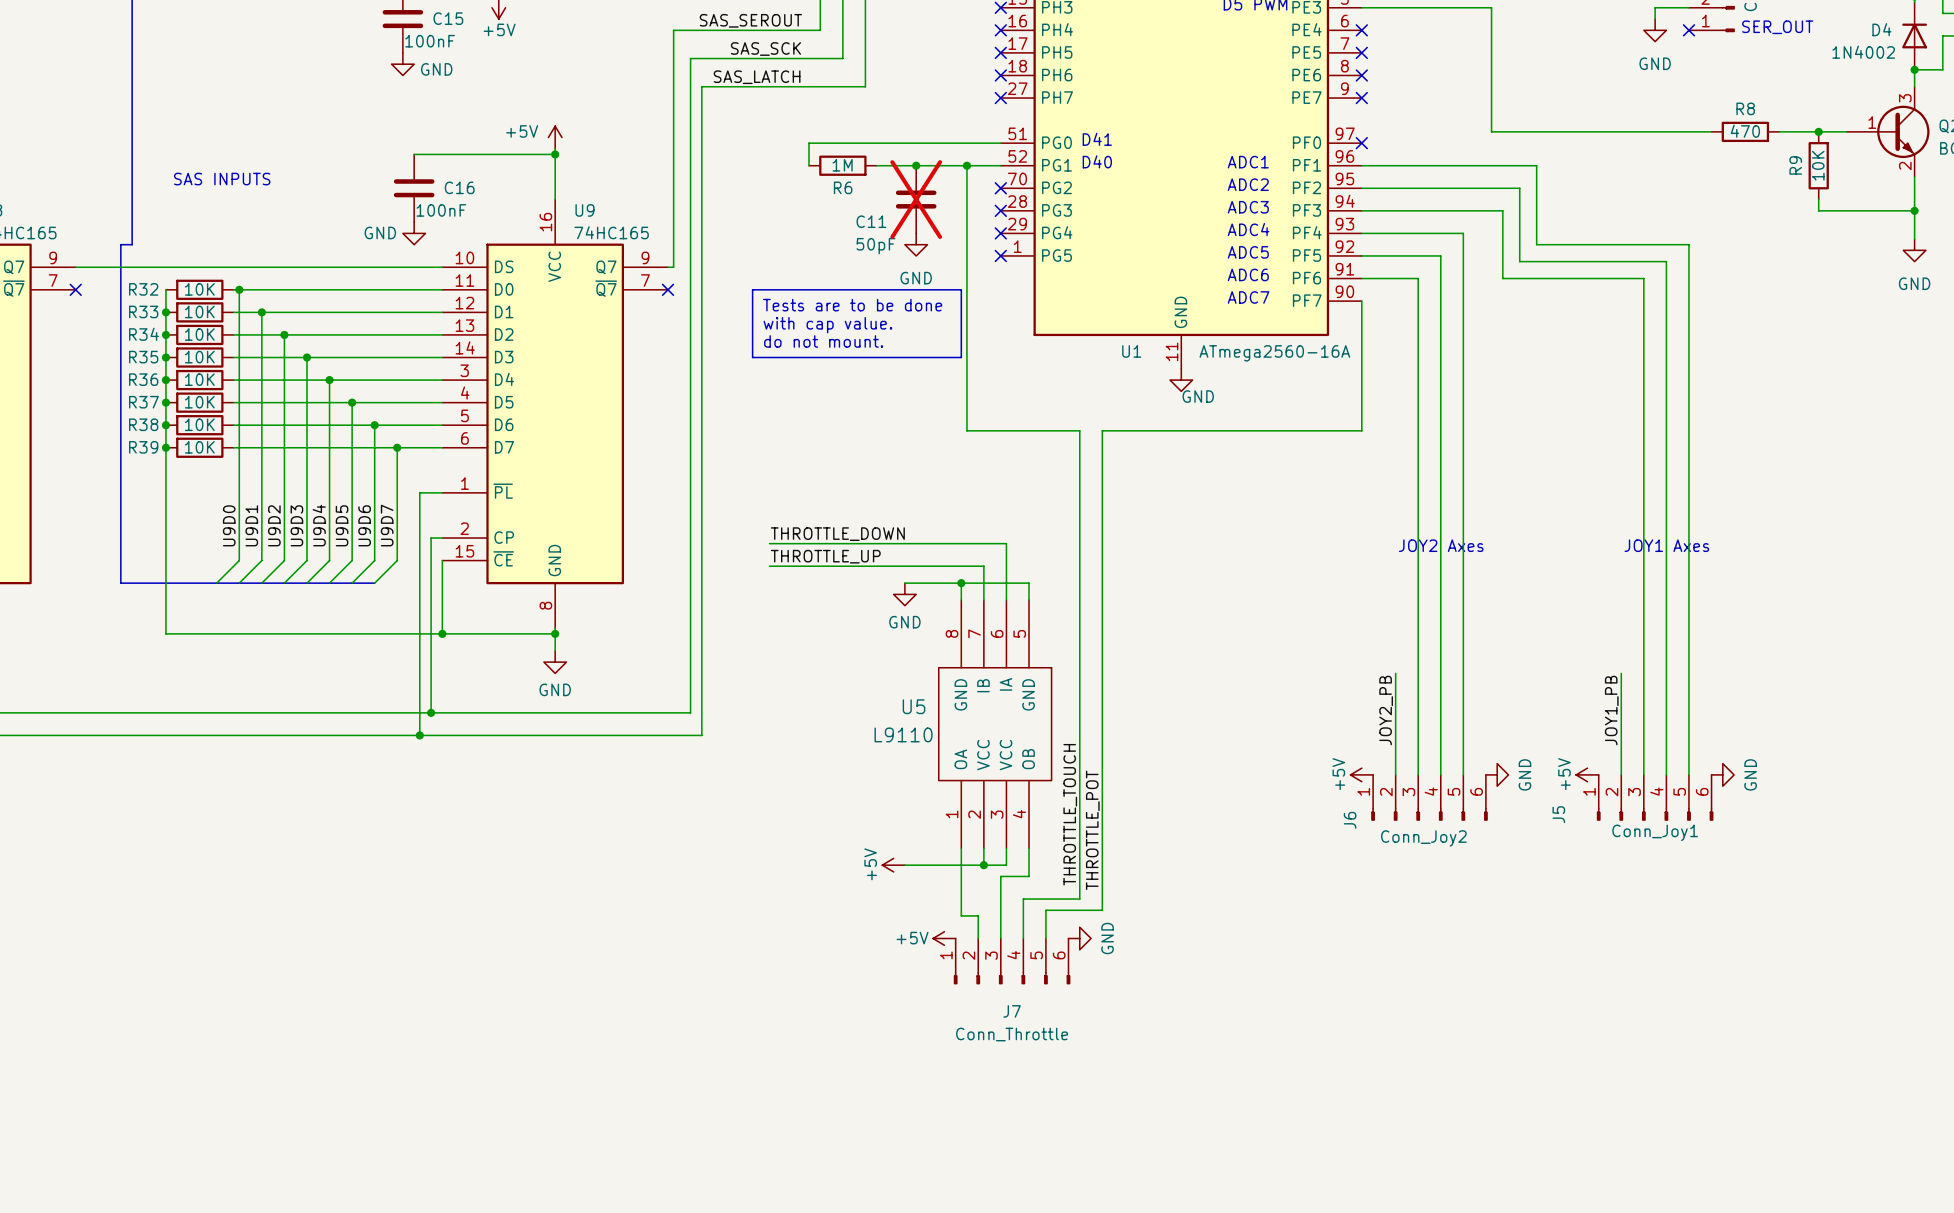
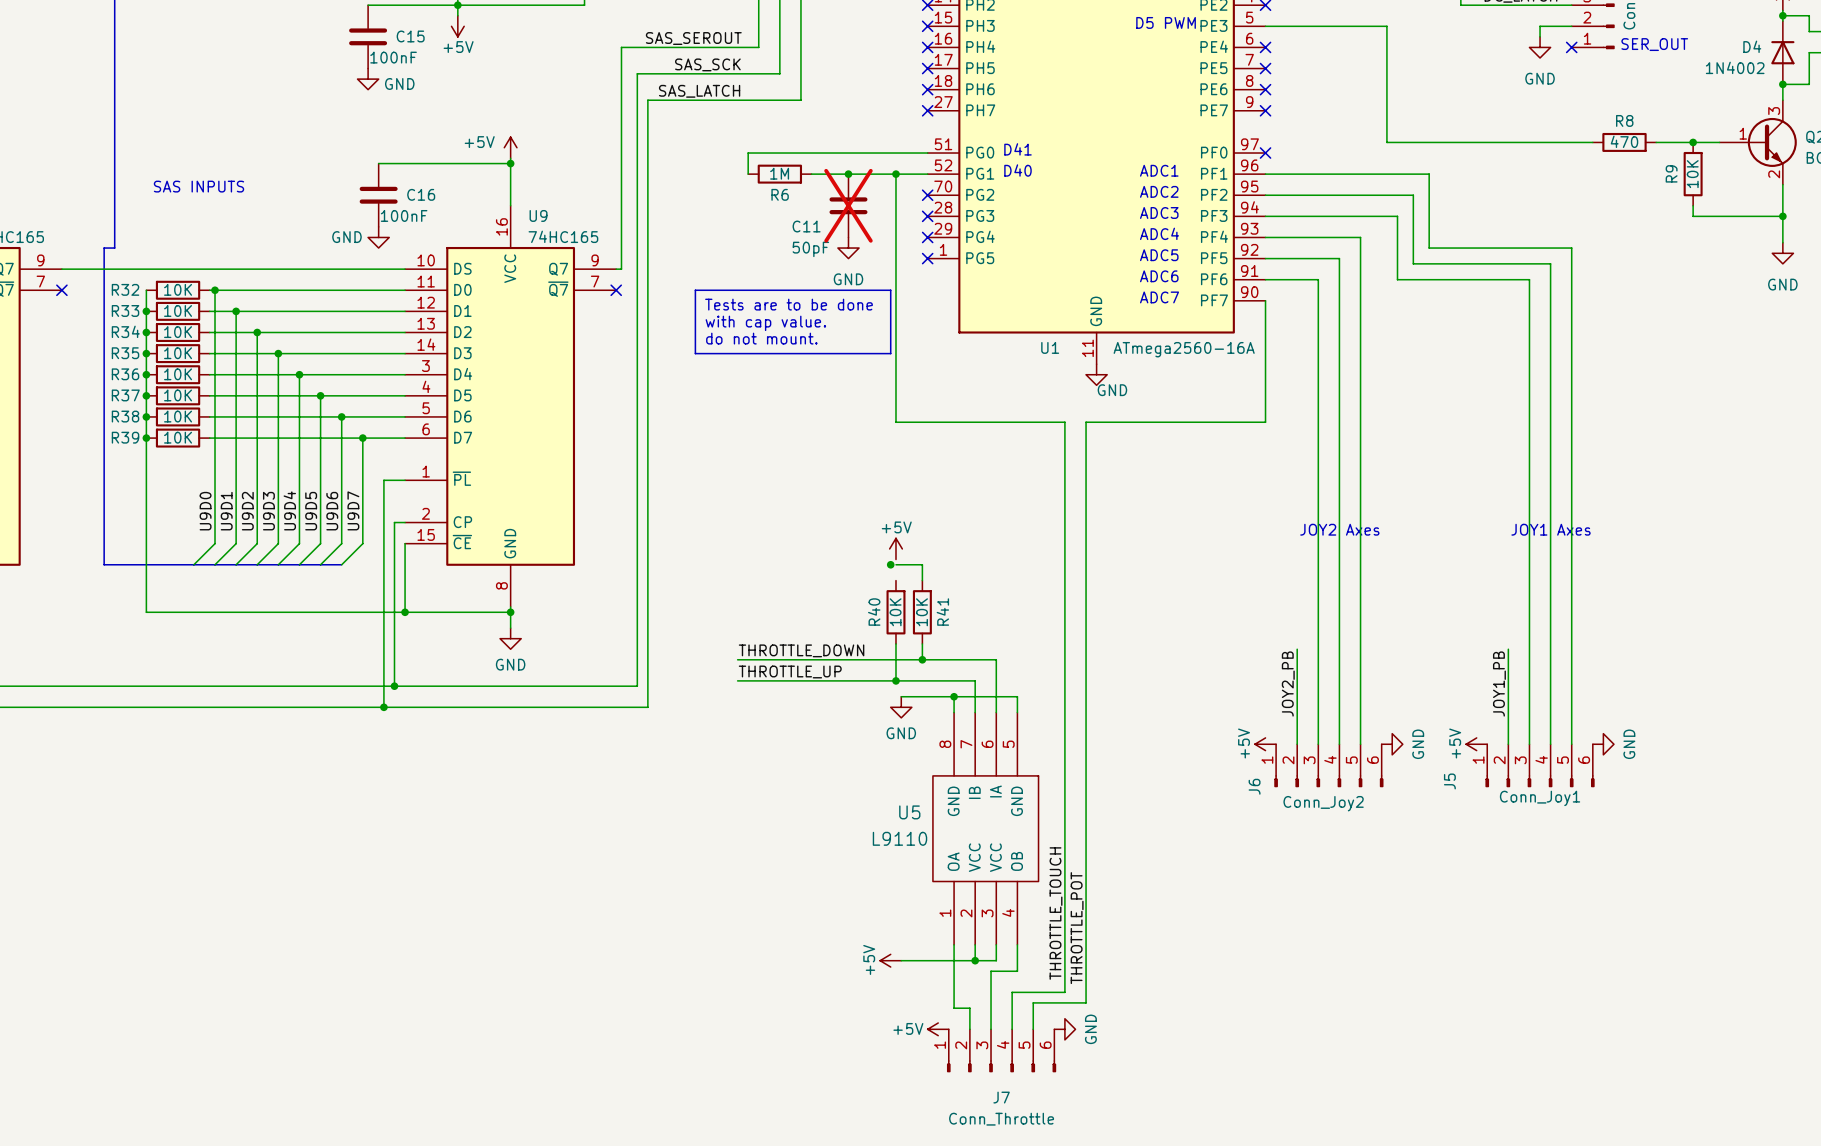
wire: (1079, 430) (1079, 899) (1023, 899) (1023, 938) -> none
wire: (1102, 430) (1102, 910) (1045, 910) (1045, 938) -> (1022, 422) (1001, 422)
wire: (1147, 430) (1170, 430) -> (1033, 1029) (1033, 1002) (1086, 1002) (1086, 422)
wire: none -> (1064, 422) (1064, 992) (1012, 992) (1012, 1029)
label position: THROTTLE_DOWN (837, 534) -> THROTTLE_DOWN (801, 650)
wire: (769, 543) (1006, 543) (1006, 600) -> none
label position: THROTTLE_UP (825, 556) -> THROTTLE_UP (790, 671)
wire: (769, 566) (983, 566) (983, 600) -> none
power symbol: none -> +5V (895, 548)
wire: (904, 583) (966, 583) -> none
wire: (961, 583) (961, 600) -> (954, 696) (954, 712)
wire: (995, 583) (1029, 583) (1029, 600) -> (922, 564) (922, 580)
power symbol: GND (904, 594) -> none
R40: none -> 10K (895, 612)
R41: none -> 10K (922, 612)
wire: none -> (895, 643) (895, 680)
wire: none -> (922, 643) (922, 659)
wire: none -> (737, 659) (996, 659) (996, 712)
junction: none -> (922, 659)
wire: none -> (737, 680) (975, 680) (975, 712)
junction: none -> (895, 680)
wire: none -> (901, 696) (1017, 696) (1017, 712)
U5 position: (995, 724) -> (985, 828)
junction: none -> (954, 696)
power symbol: none -> GND (901, 707)
label position: THROTTLE_TOUCH (1070, 814) -> THROTTLE_TOUCH (1056, 913)
label position: THROTTLE_POT (1092, 830) -> THROTTLE_POT (1077, 928)
wire: (961, 848) (961, 915) (978, 915) (978, 938) -> (954, 944) (954, 1008) (969, 1008) (969, 1029)
wire: (983, 848) (983, 865) -> (975, 944) (975, 960)
wire: (1006, 848) (1006, 865) (904, 865) -> (996, 944) (996, 960) (901, 960)
wire: (1029, 848) (1029, 876) (1000, 876) (1000, 938) -> (1017, 944) (1017, 971) (991, 971) (991, 1029)
power symbol: +5V (893, 865) -> none
junction: (983, 865) -> none
power symbol text rotation: 0° (912, 938) -> 90° counterclockwise (869, 959)
power symbol position: +5V (944, 938) -> +5V (890, 960)
power symbol: GND (1079, 938) -> none
J7 position: (1012, 961) -> (1001, 1050)
junction: none -> (975, 960)
power symbol: none -> +5V (938, 1029)
power symbol: none -> GND (1064, 1029)

